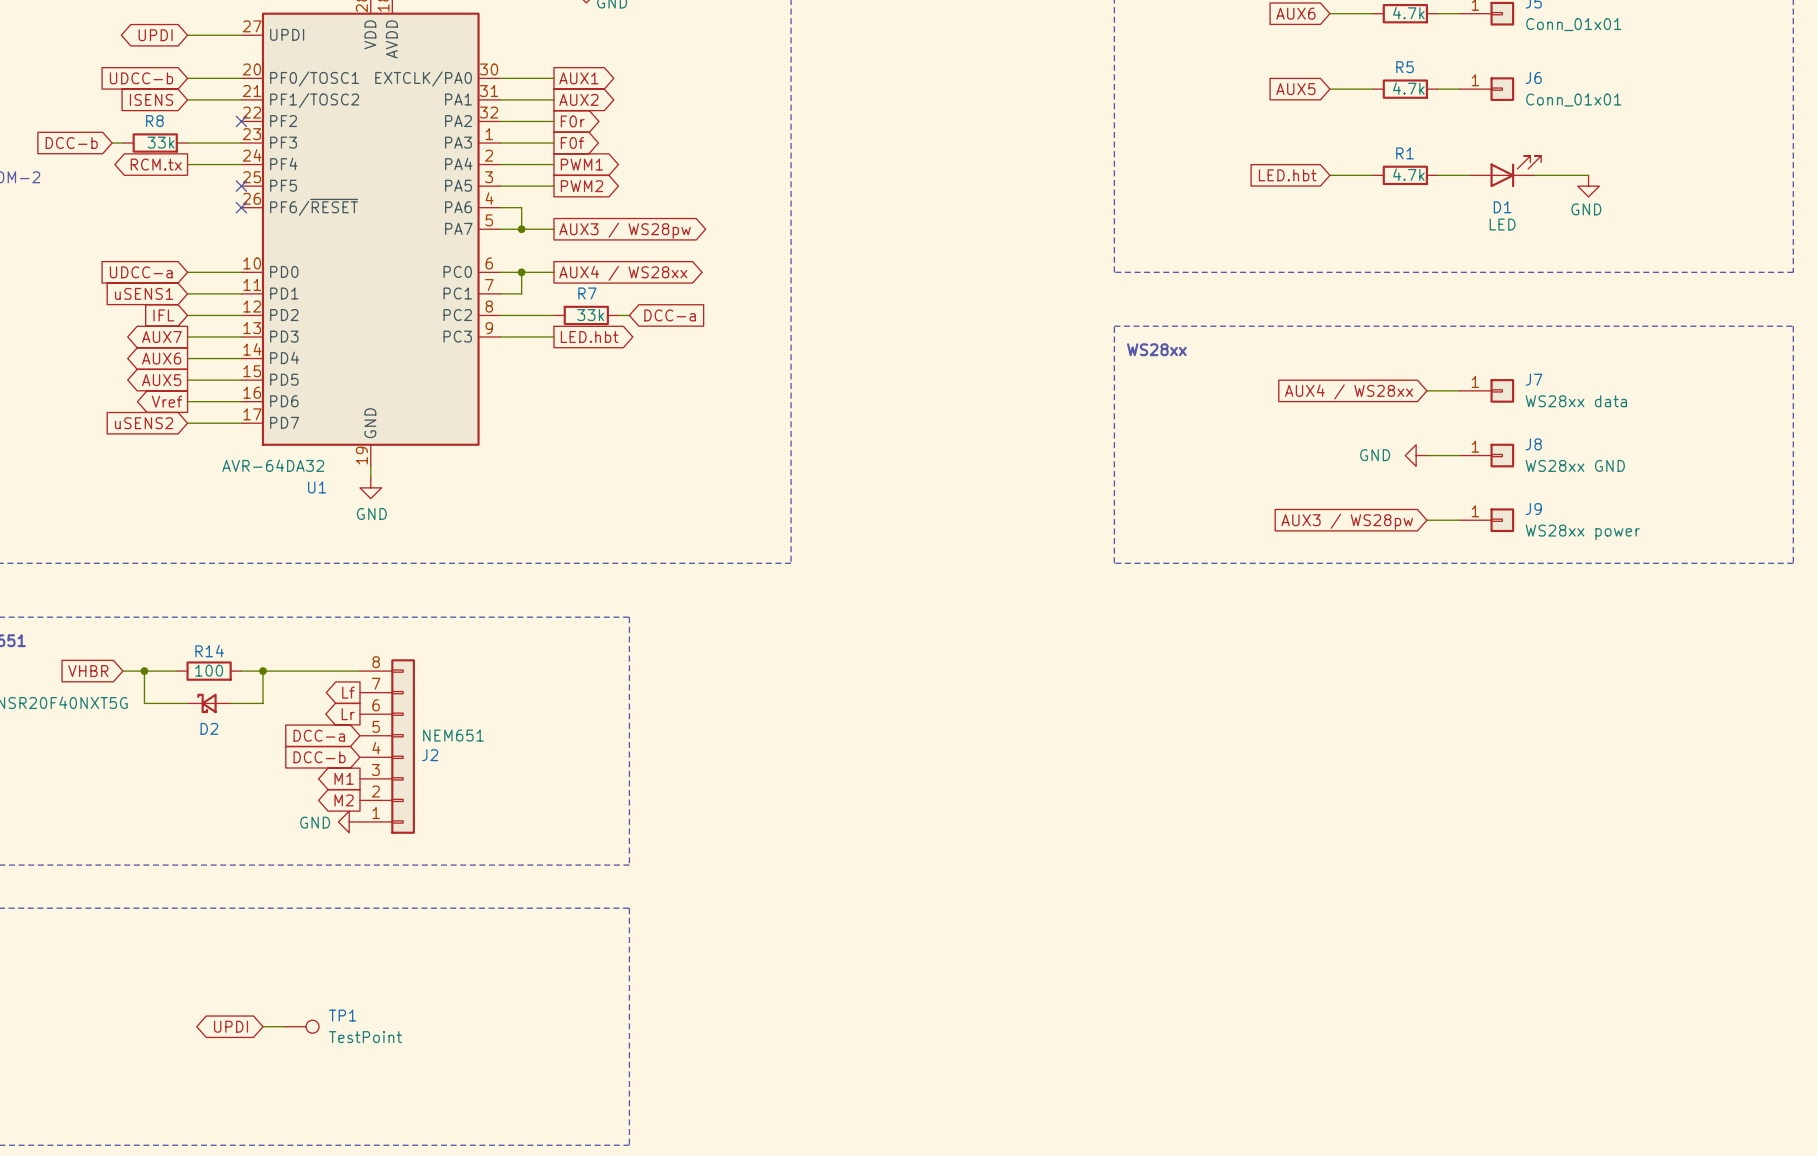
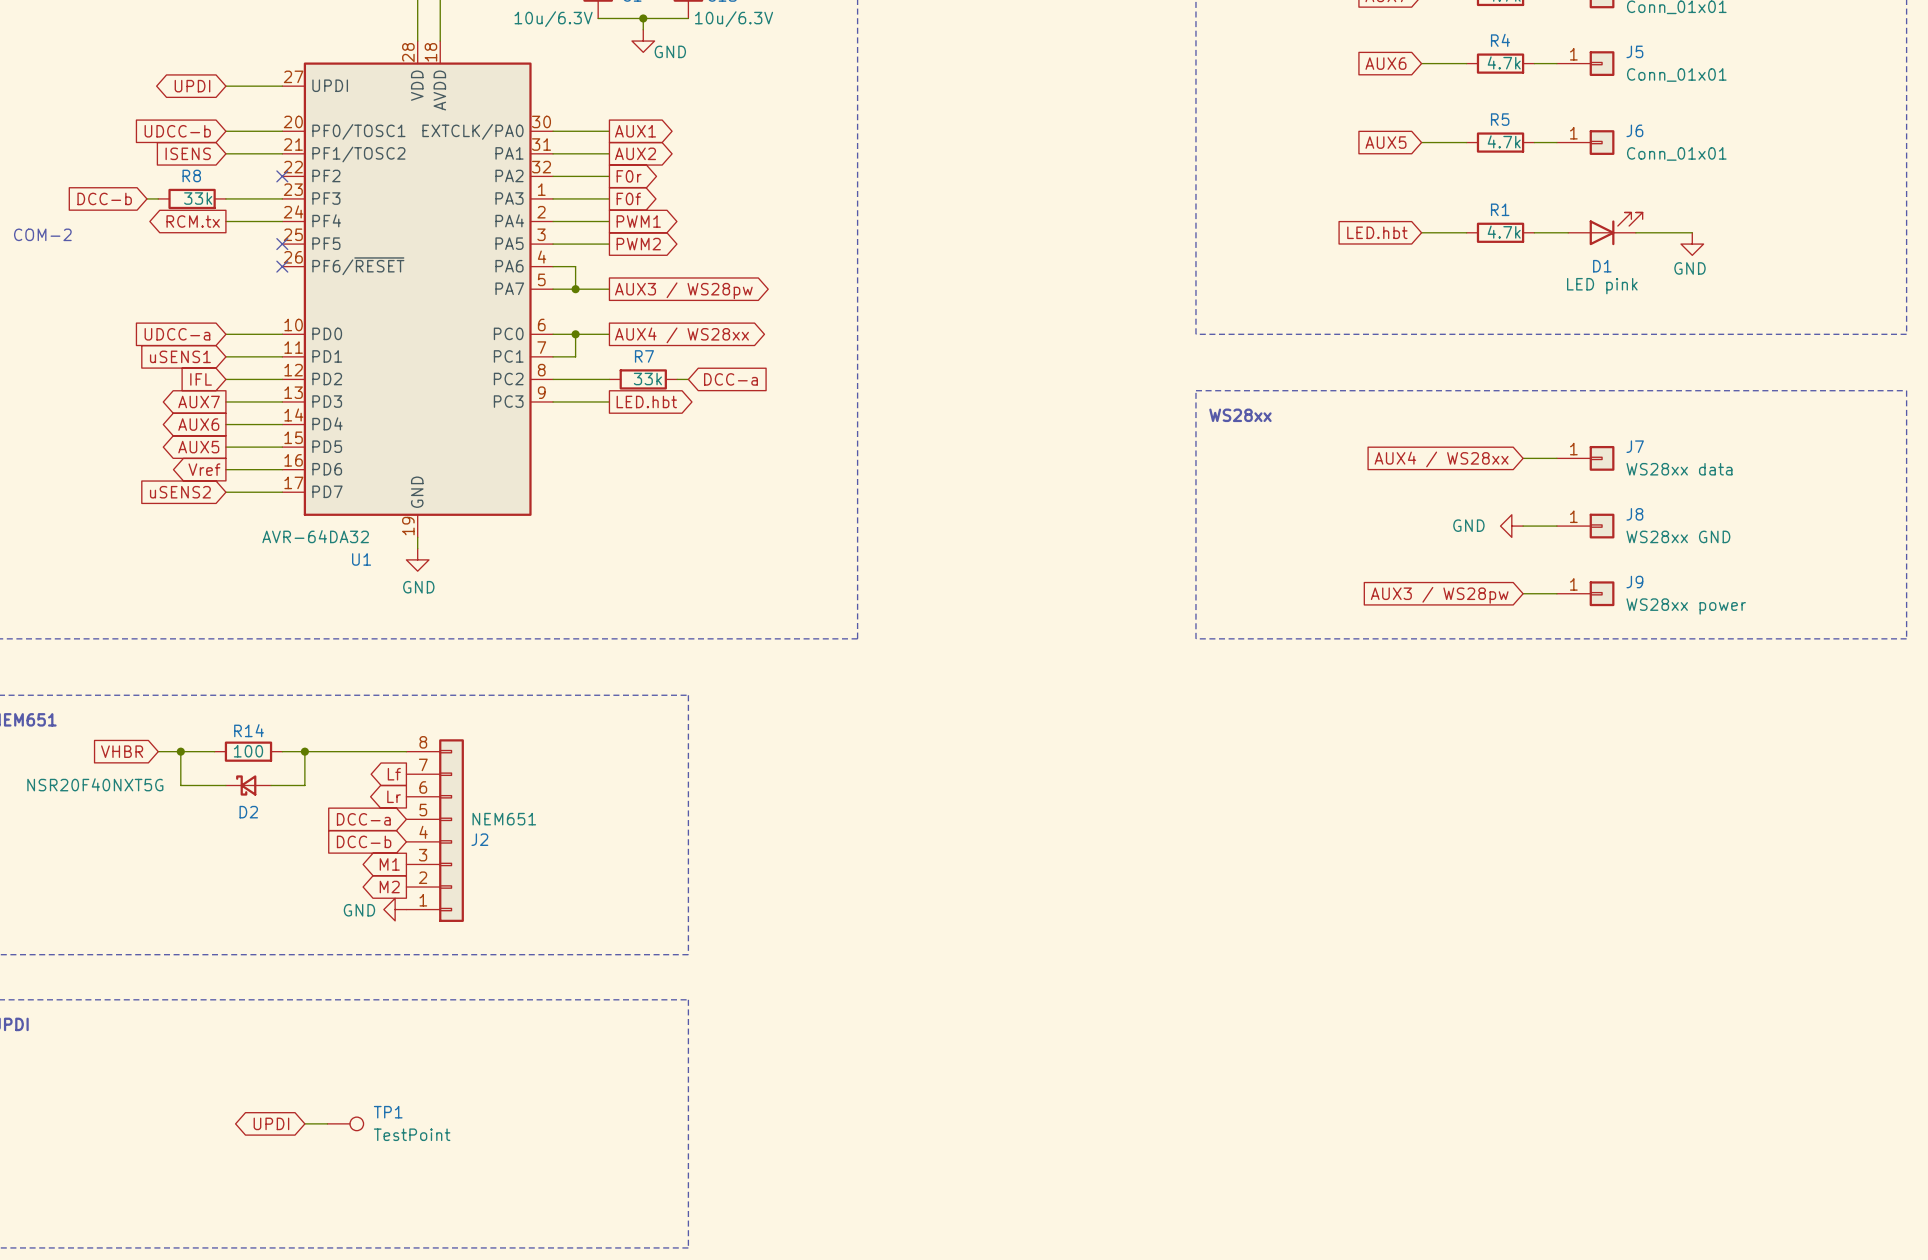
D1 value: LED (1502, 224) -> LED pink (1602, 286)

